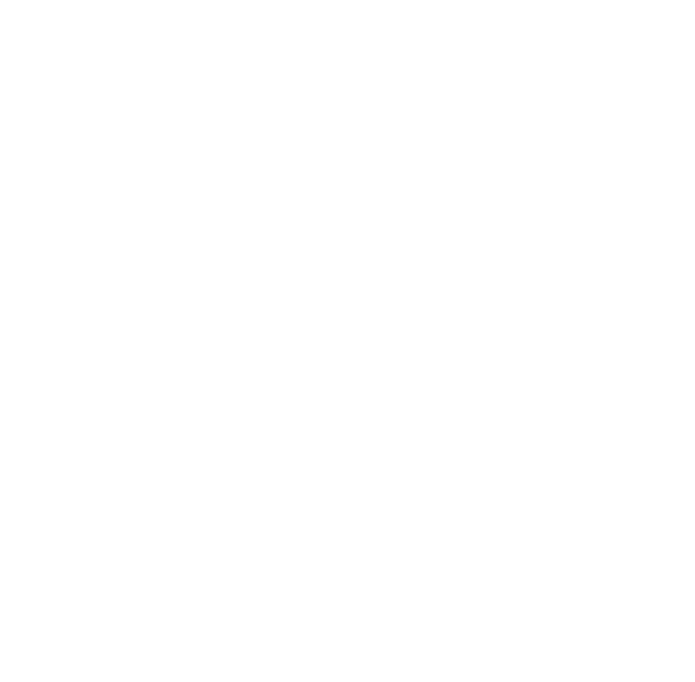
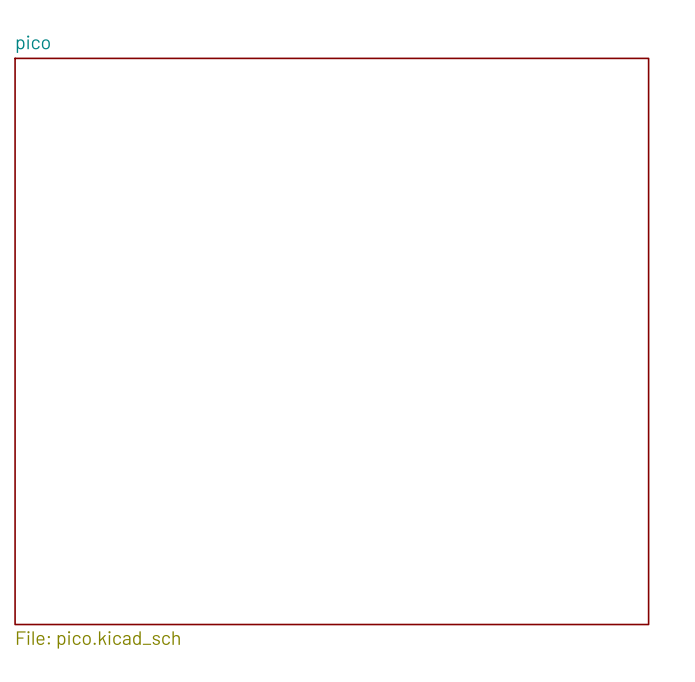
sheet pico: none -> File: pico.kicad_sch (331, 341)

